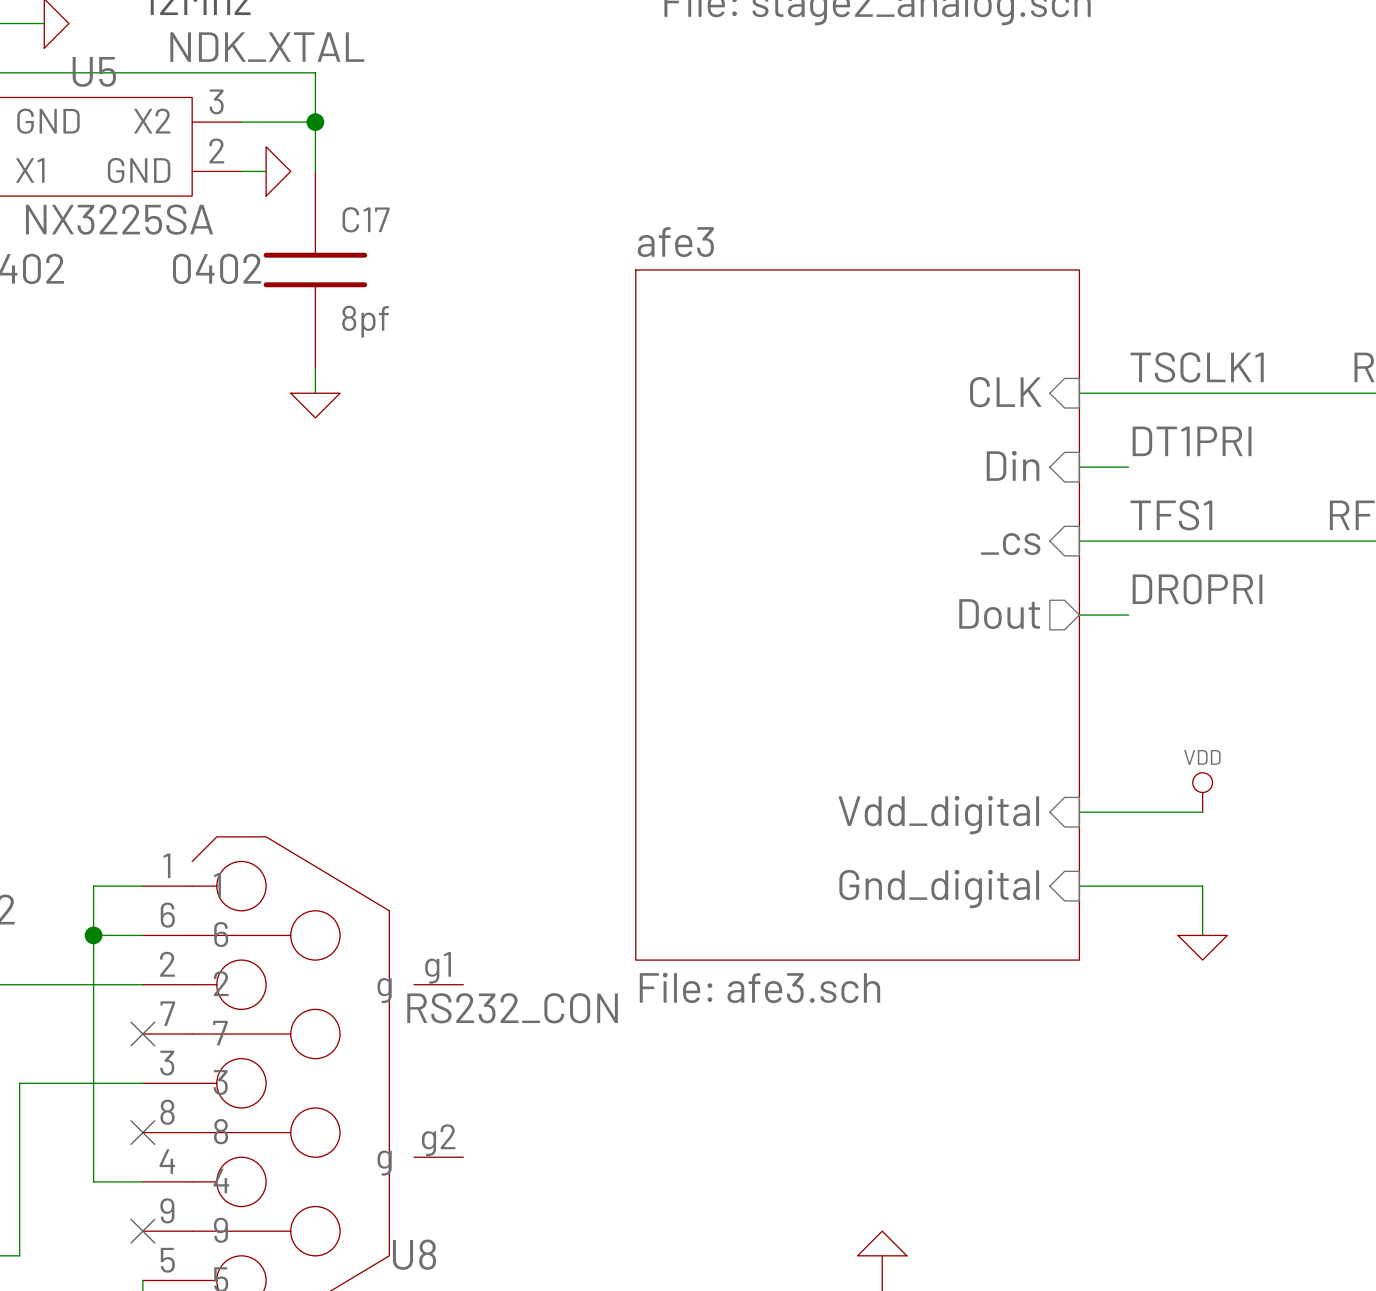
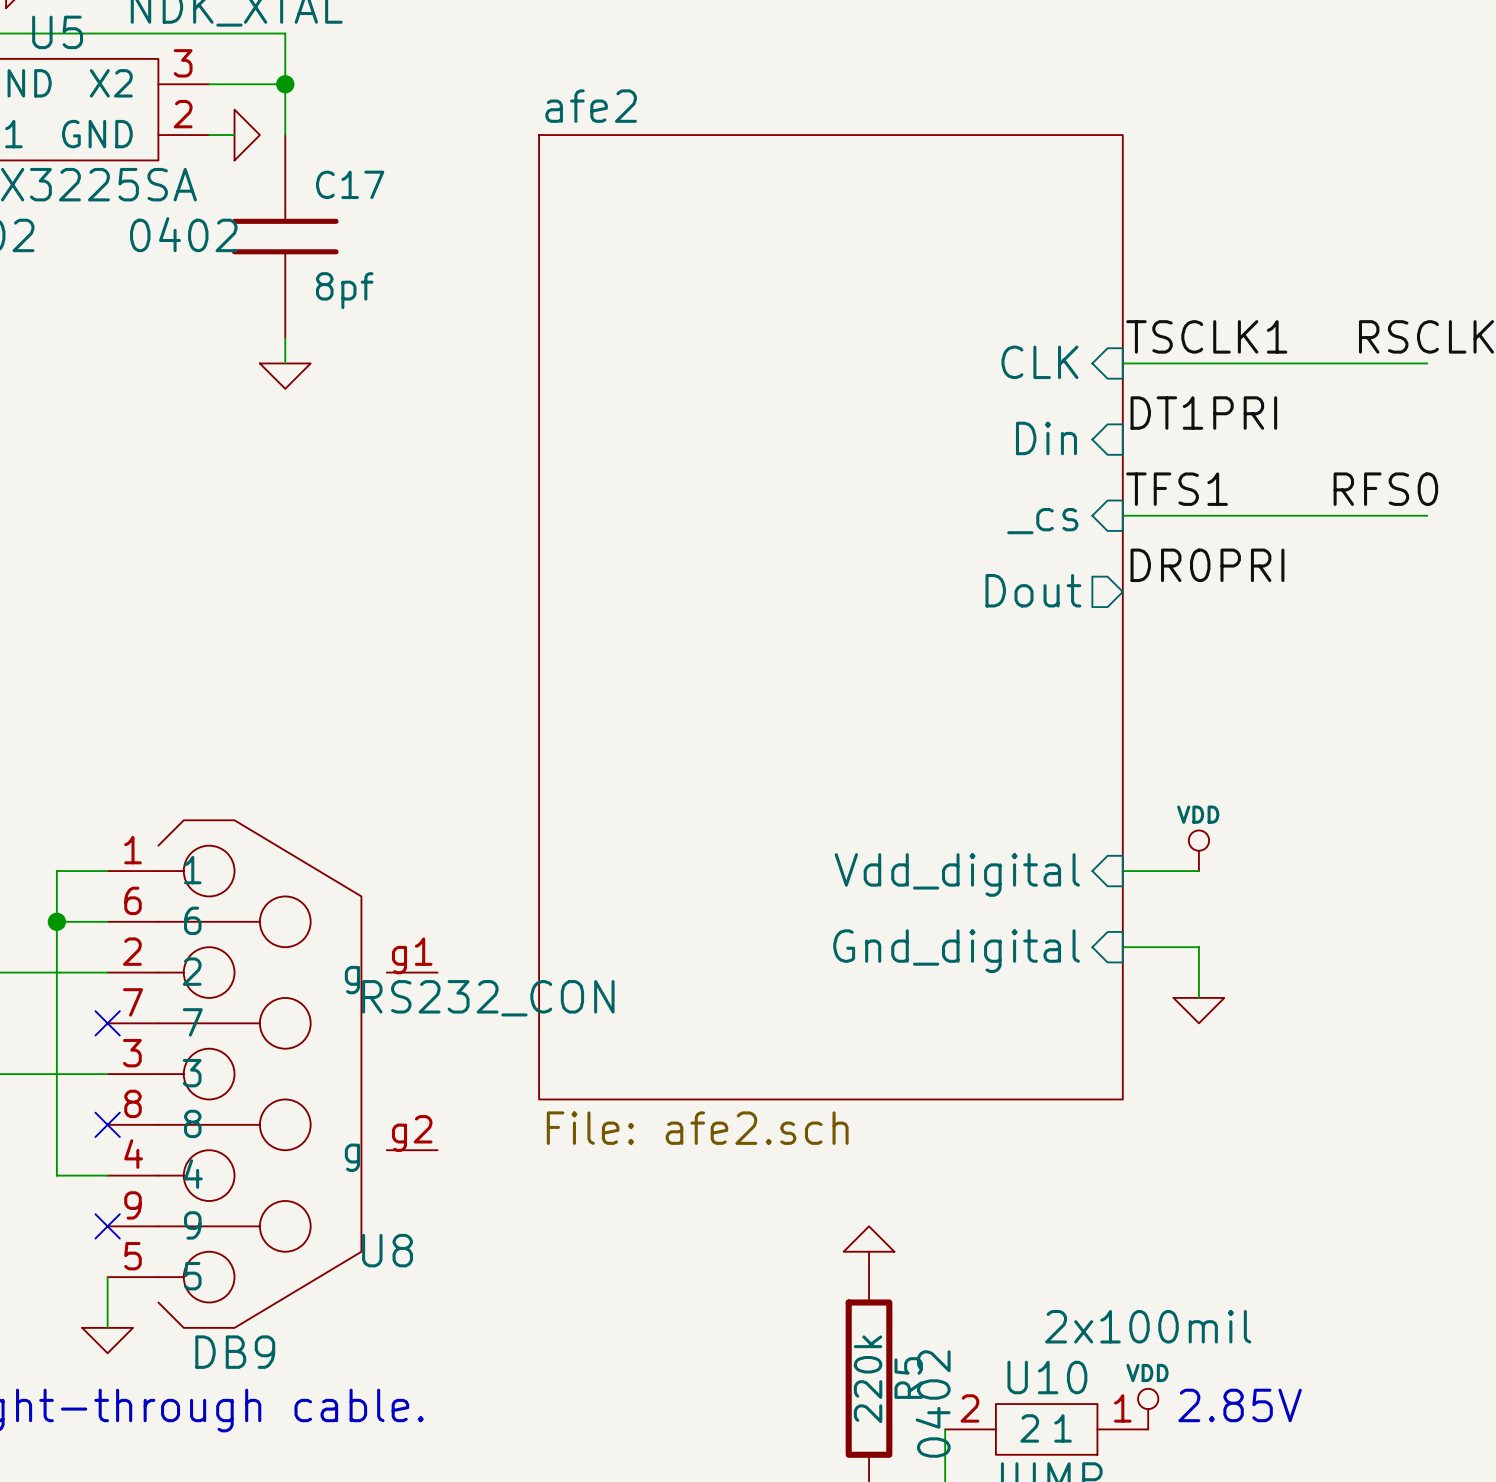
sheet pin position: CLK (1005, 392) -> CLK (1039, 362)
wire: (1079, 393) (1128, 393) -> none
sheet pin position: Din (1013, 465) -> Din (1046, 438)
wire: (1079, 467) (1128, 467) -> none
wire: (1079, 541) (1128, 541) -> none
sheet pin position: _cs (1010, 544) -> _cs (1042, 521)
sheet pin position: Dout (999, 614) -> Dout (1033, 590)
sheet afe3: File: afe3.sch (857, 615) -> none
wire: (1079, 615) (1128, 615) -> none
sheet afe2: none -> File: afe2.sch (830, 617)
power symbol position: VDD (1202, 792) -> VDD (1198, 850)
wire: (1079, 812) (1202, 812) -> none
sheet pin position: Vdd_digital (938, 815) -> Vdd_digital (957, 874)
wire: (1079, 886) (1128, 886) -> none
wire: (1202, 886) (1202, 935) -> none
sheet pin position: Gnd_digital (939, 889) -> Gnd_digital (956, 951)
power symbol position: (1202, 947) -> (1198, 1010)
wire: none -> (1122, 947) (1198, 947) (1198, 997)

